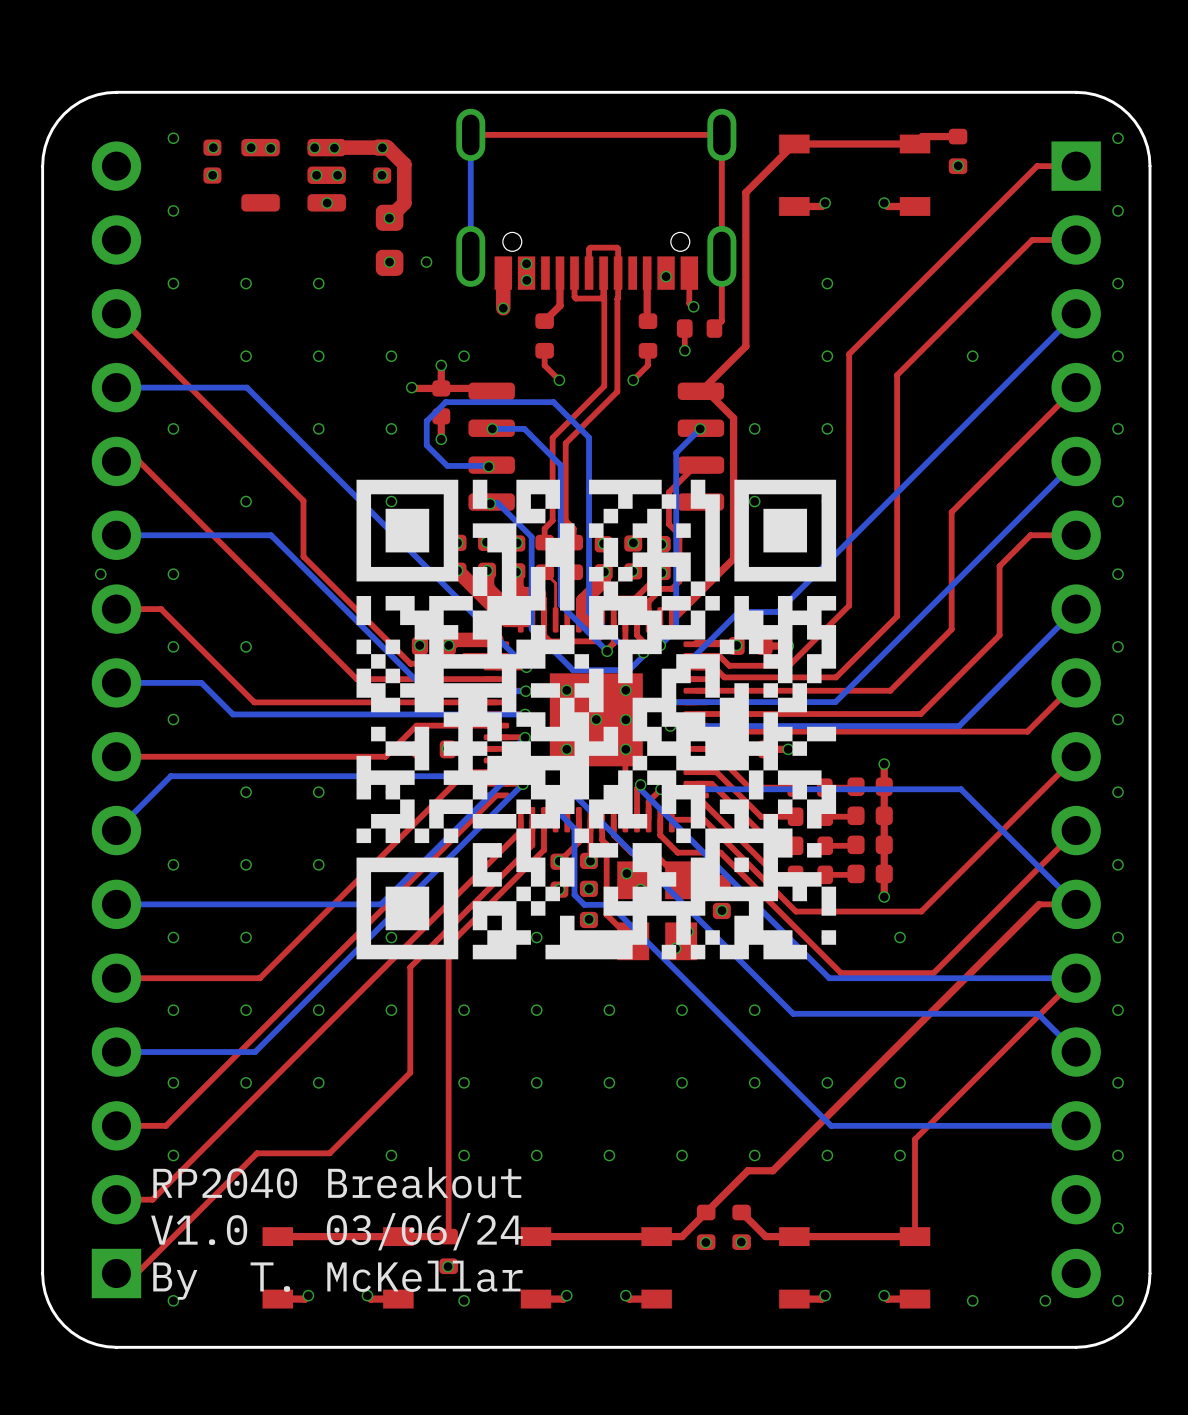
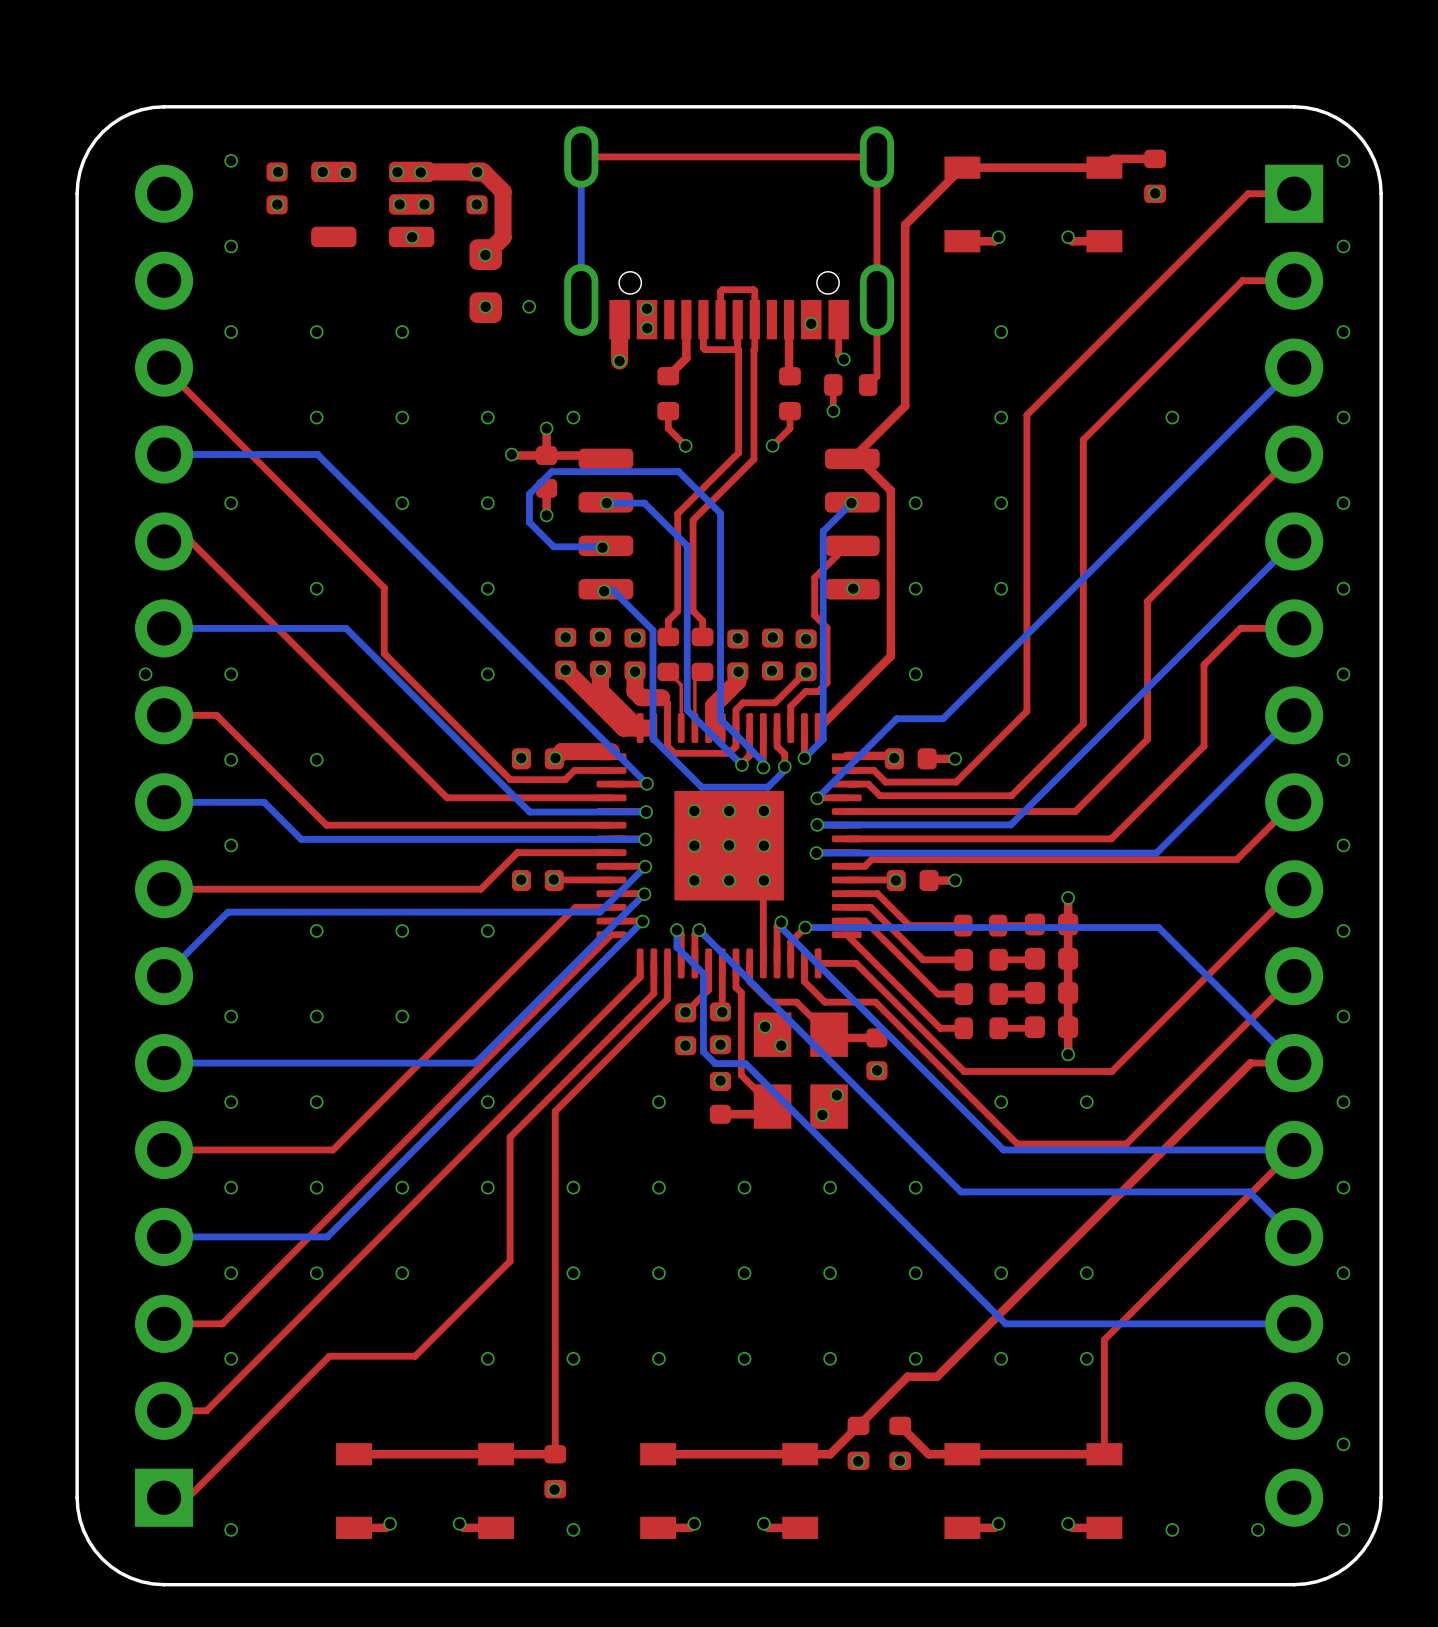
drawing: [356, 479, 837, 960] -> none
text: RP2040 Breakout (337, 1182) -> none
text: V1.0 03/06/24 (336, 1231) -> none
text: By T. McKellar (337, 1280) -> none

